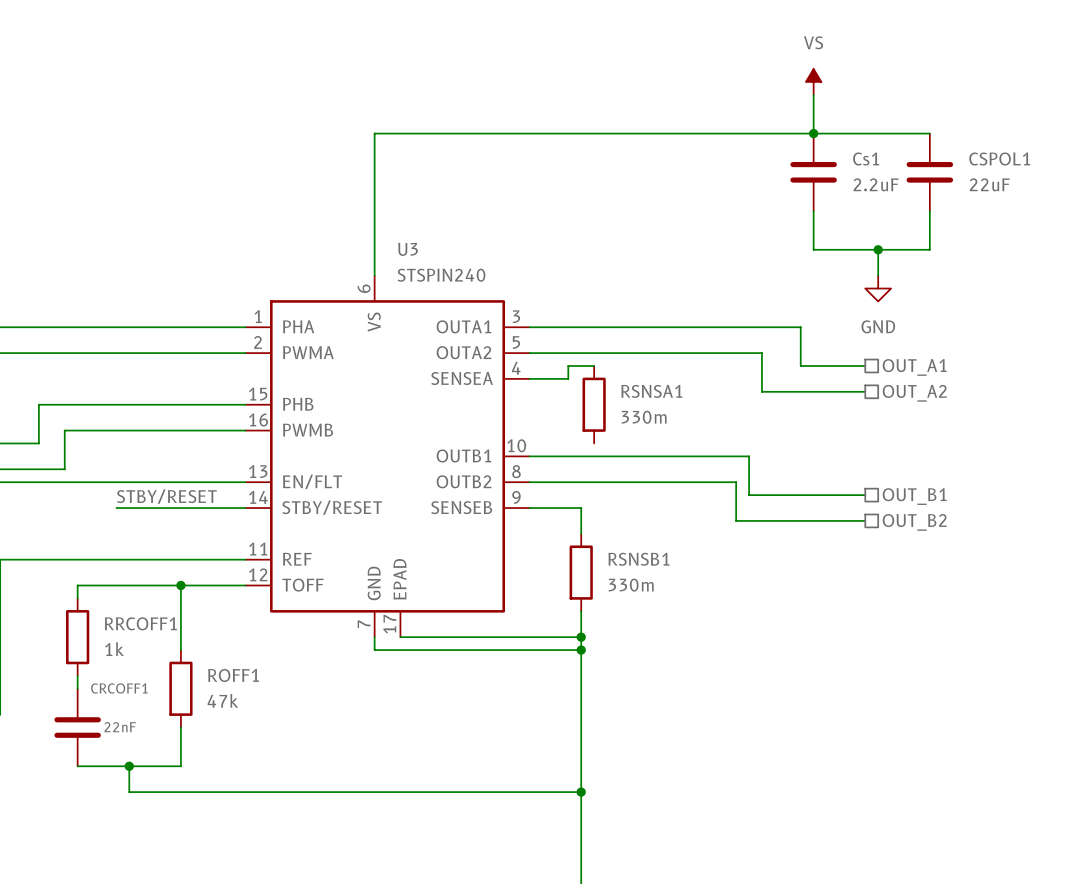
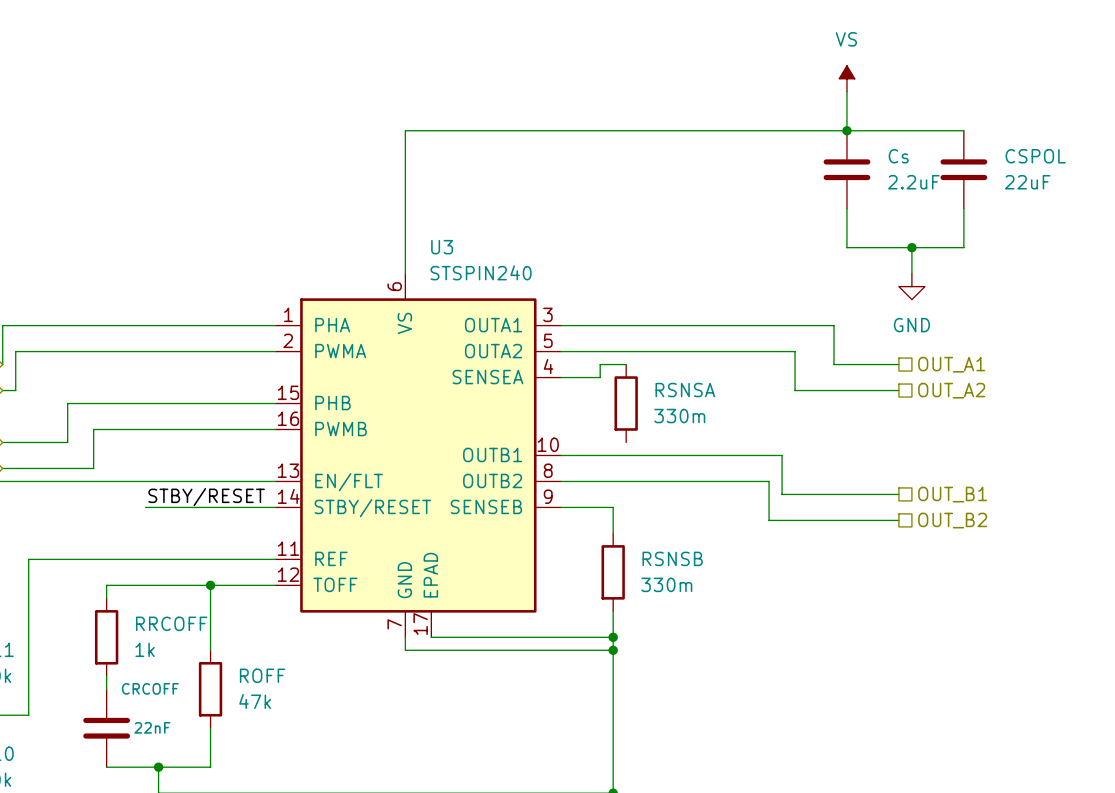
Cs1 name: Cs1 (866, 158) -> Cs (898, 156)
CSPOL1 name: CSPOL1 (999, 158) -> CSPOL (1035, 156)
RSNSA1 name: RSNSA1 (651, 391) -> RSNSA (685, 390)
RSNSB1 name: RSNSB1 (638, 559) -> RSNSB (672, 558)
RRCOFF1 name: RRCOFF1 (140, 623) -> RRCOFF (171, 623)
ROFF1 name: ROFF1 (233, 675) -> ROFF (262, 675)
CRCOFF1 name: CRCOFF1 (119, 688) -> CRCOFF (150, 688)

